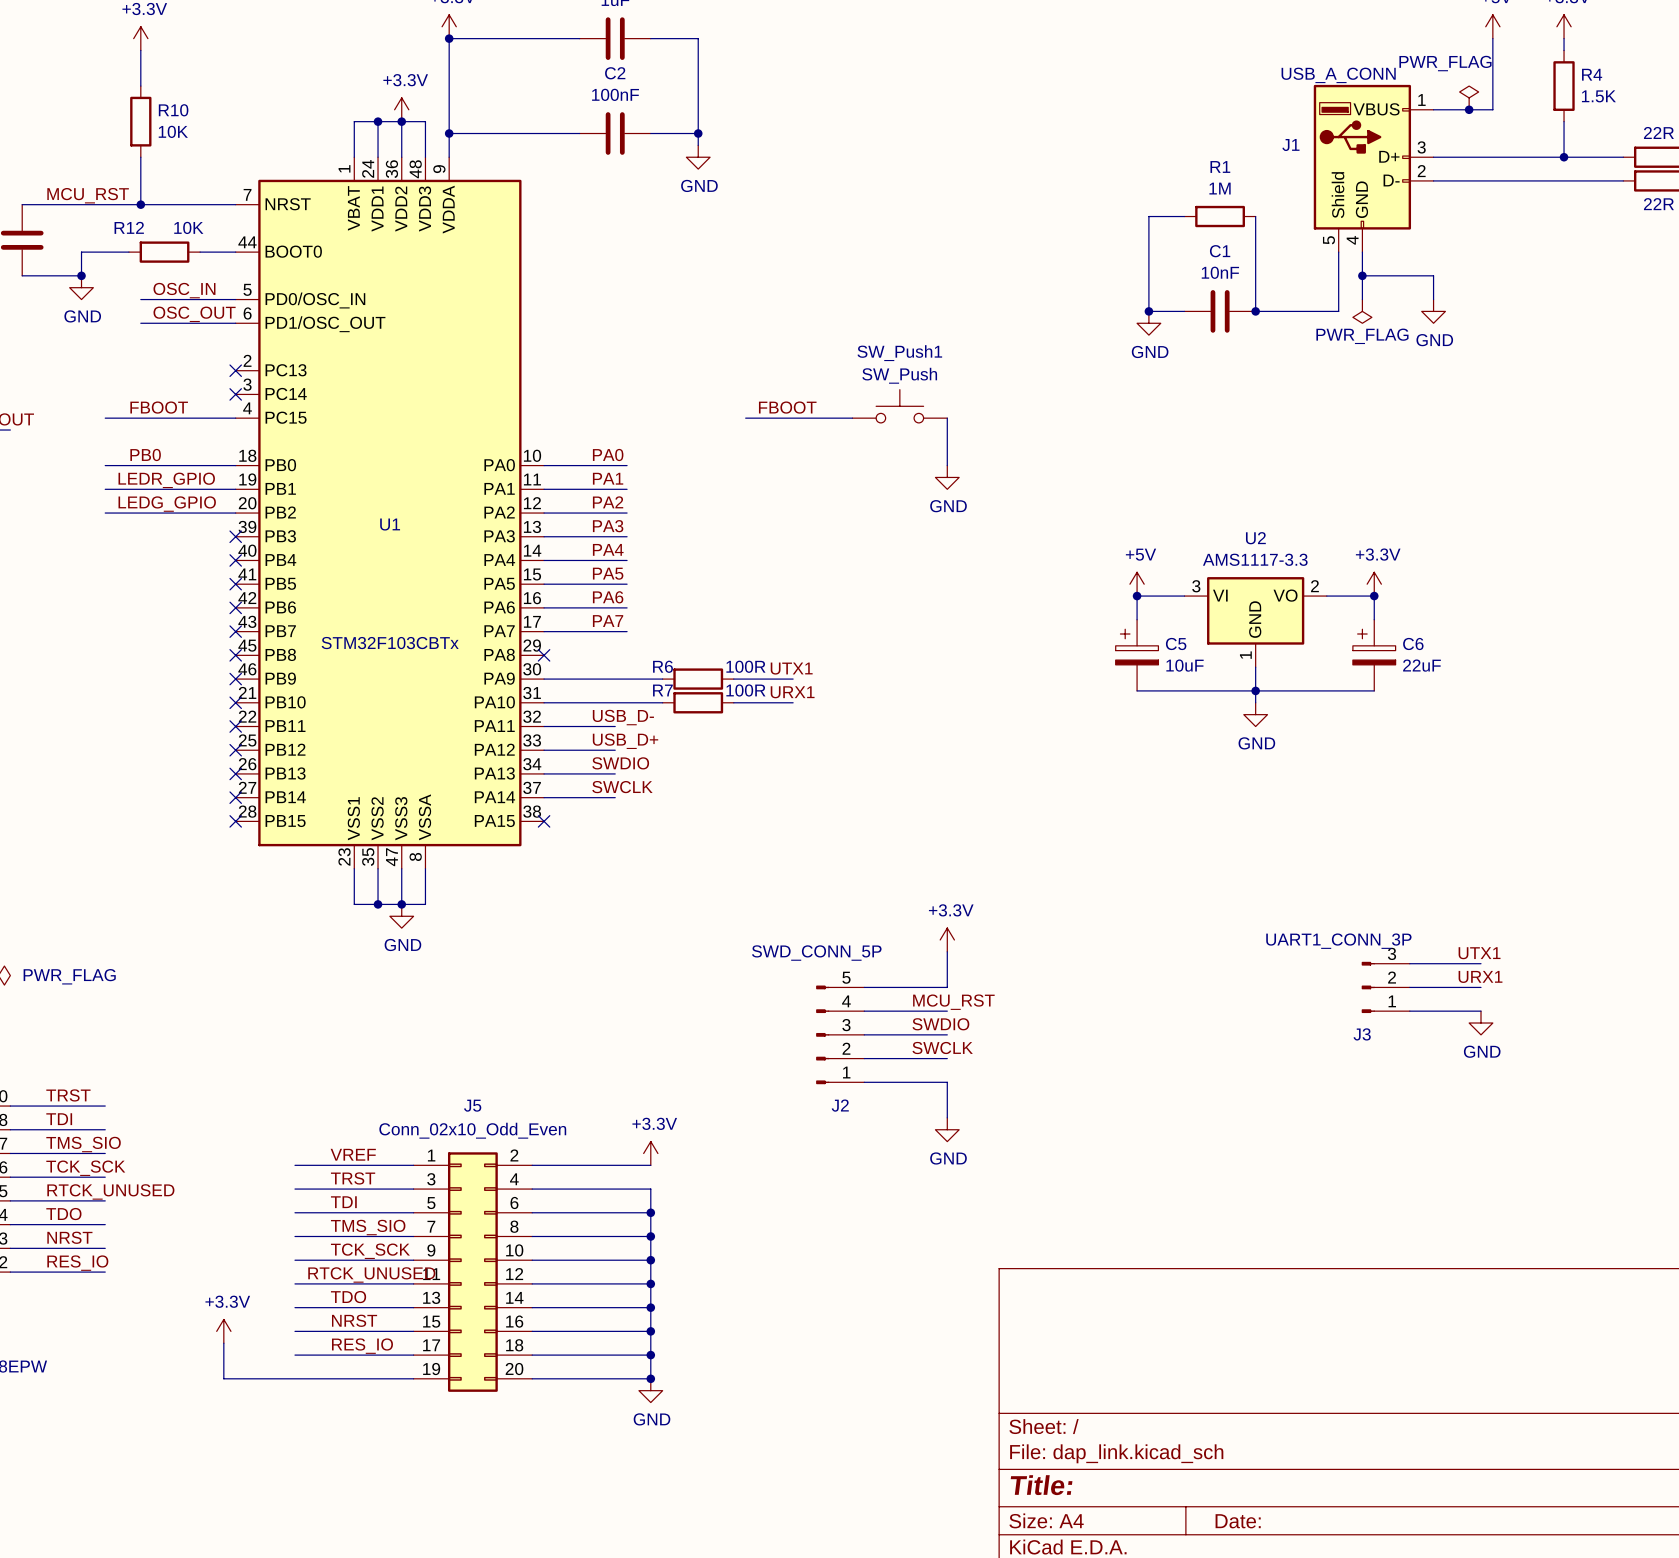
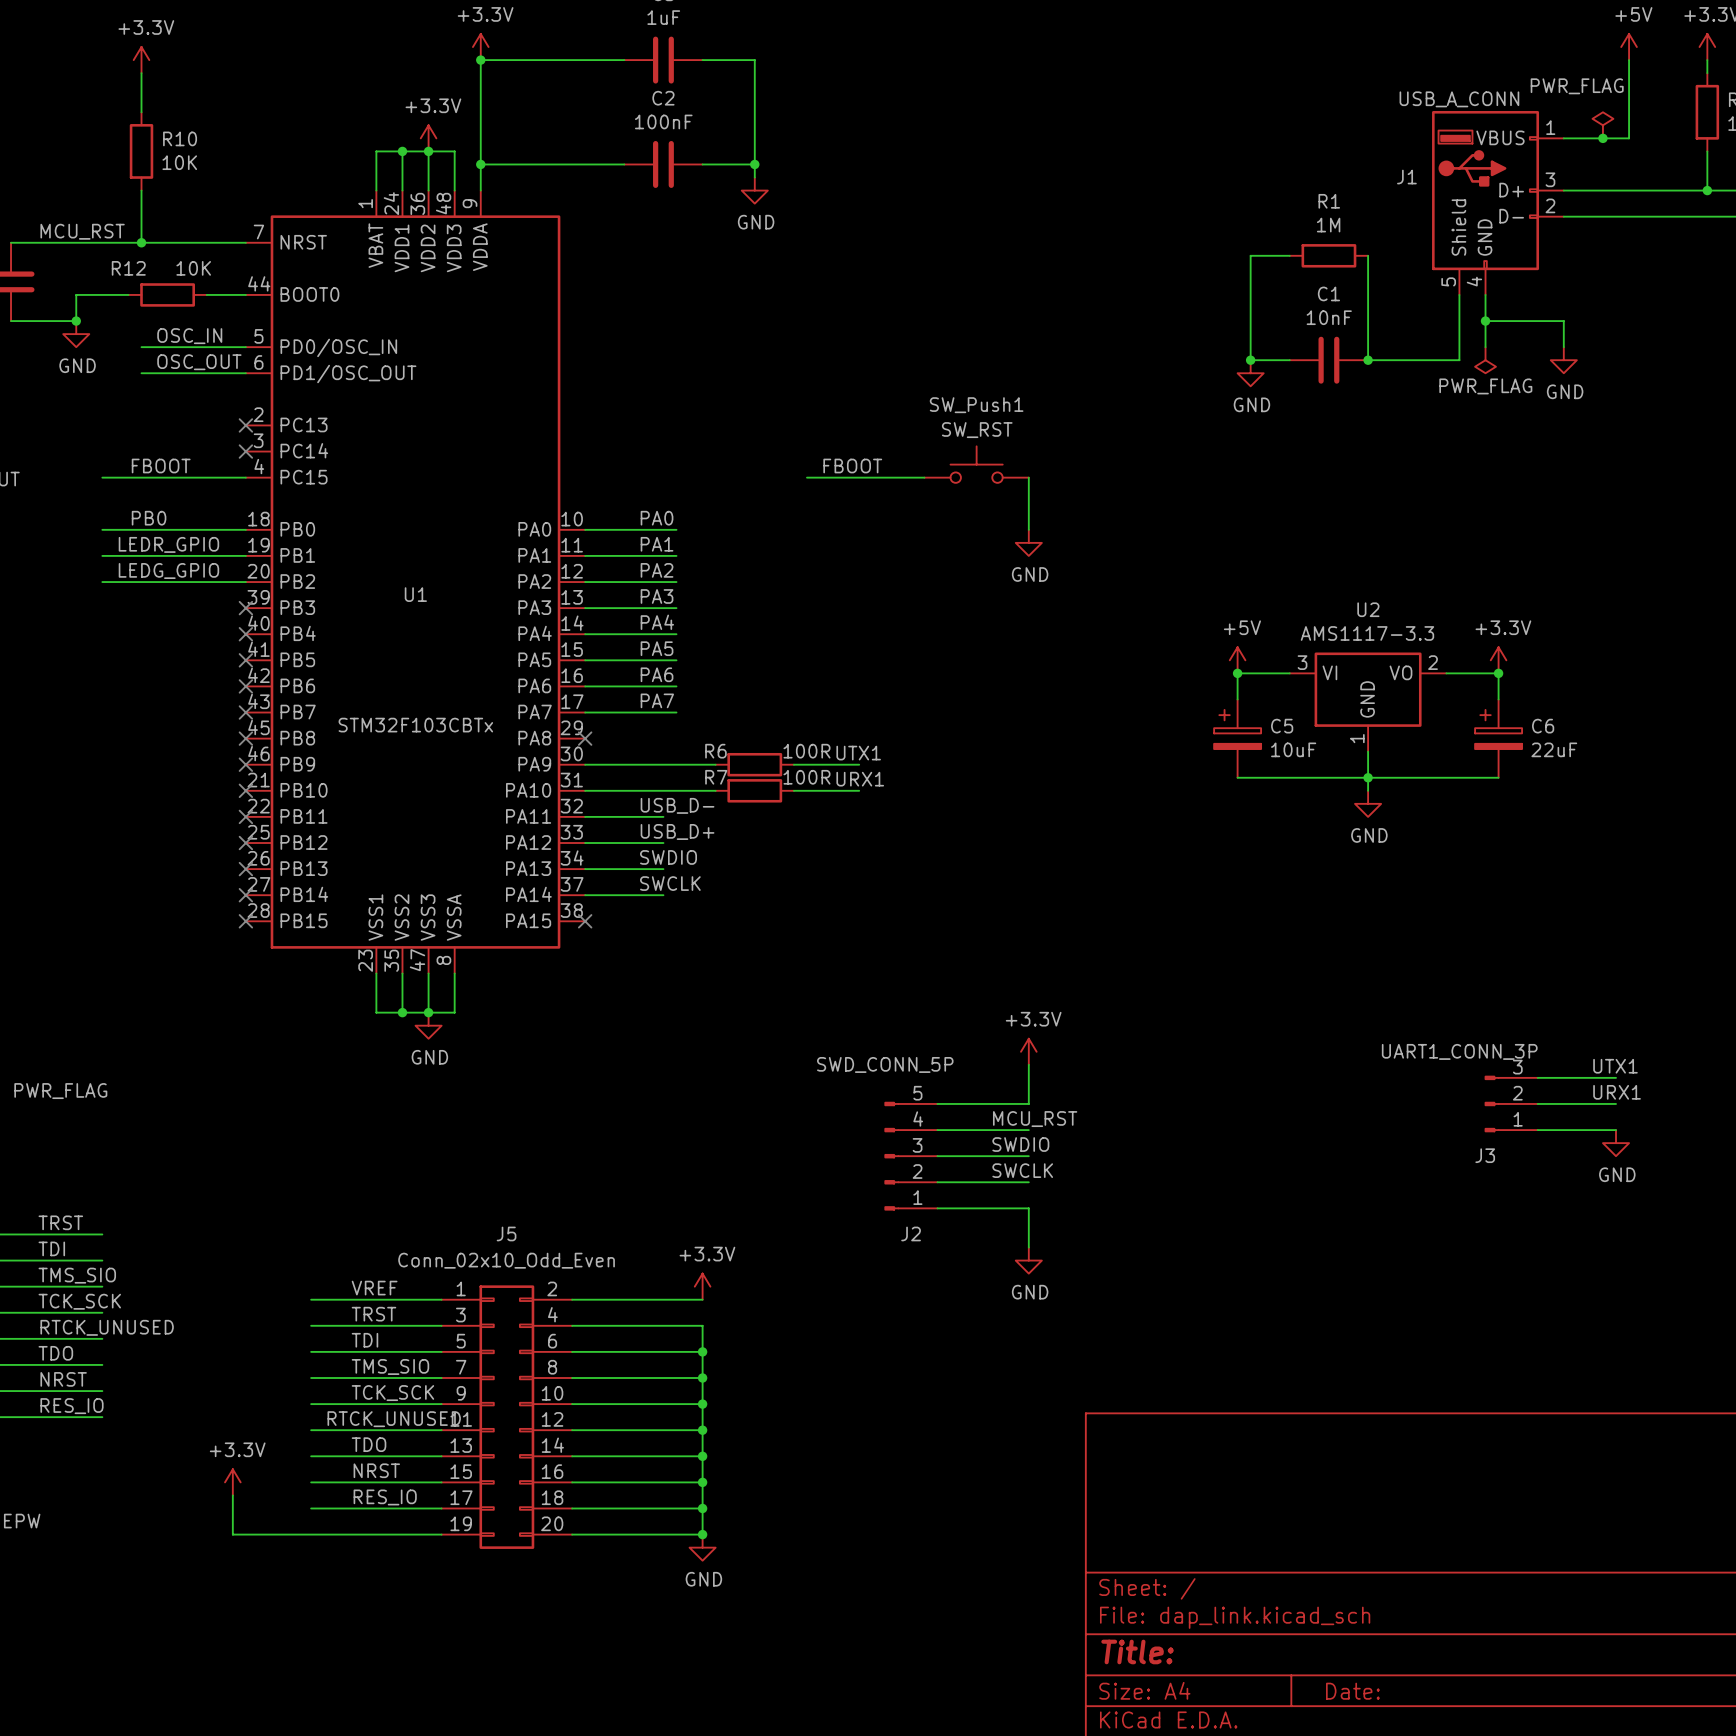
SW_Push1 value: SW_Push (899, 375) -> SW_RST (977, 430)

